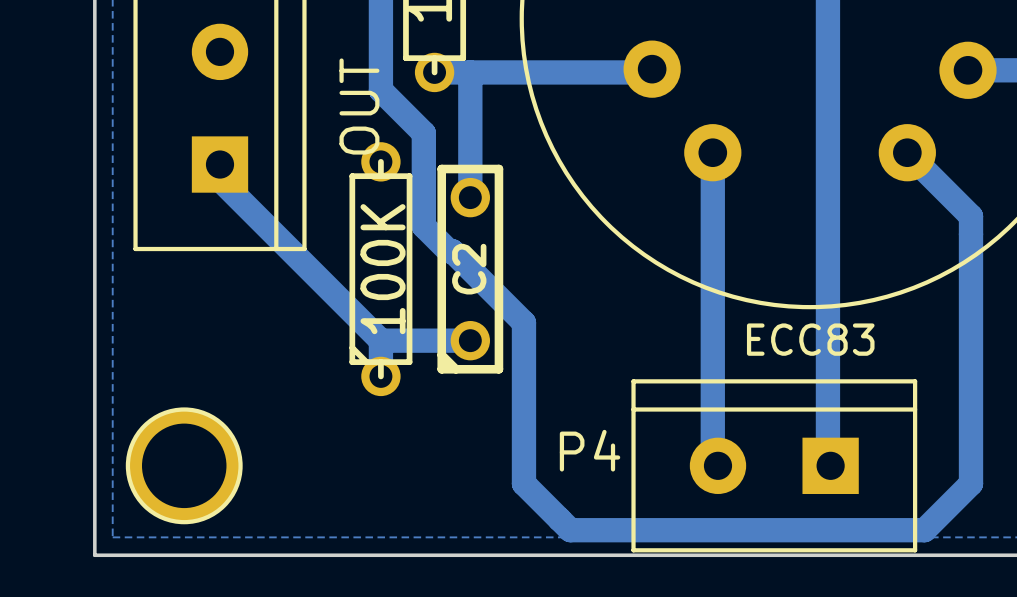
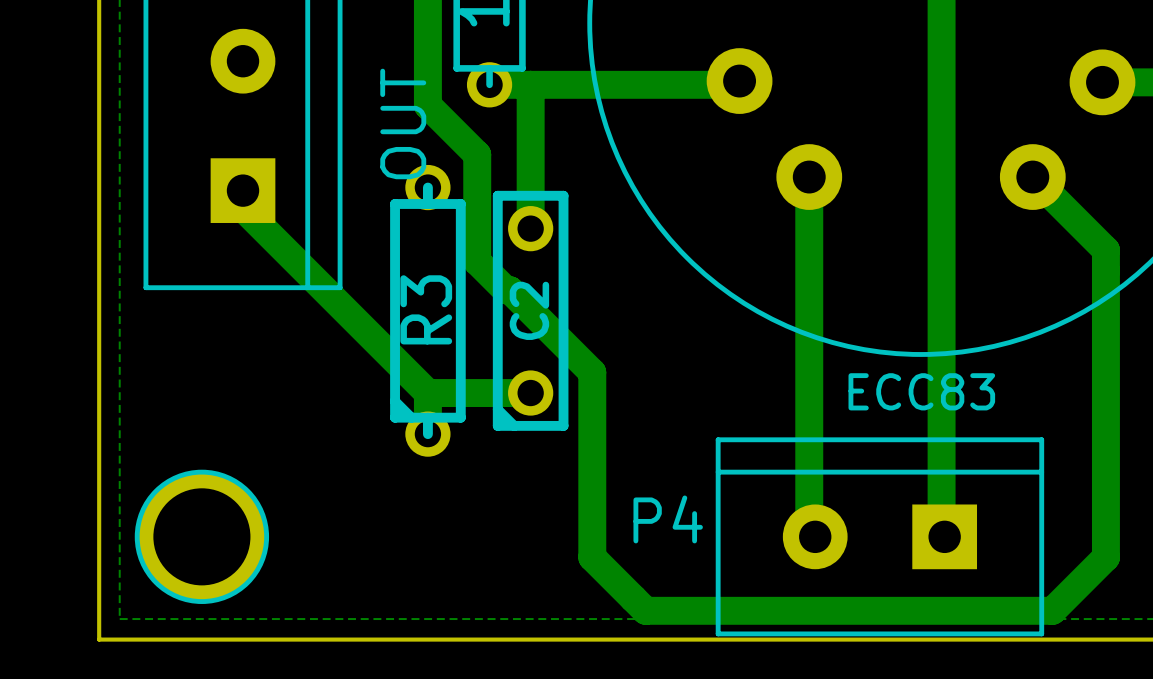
part: 100K (380, 269) -> none
R3: none -> (427, 310)

